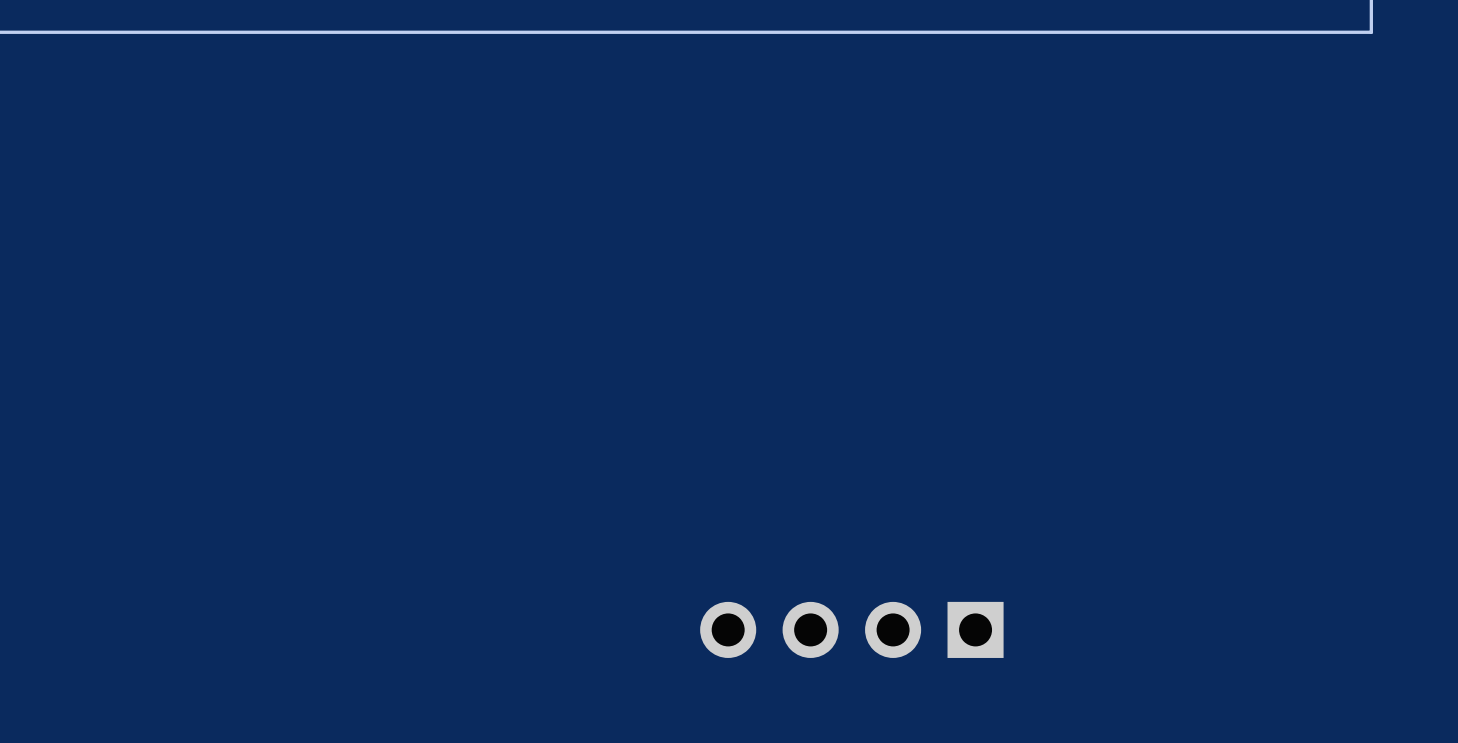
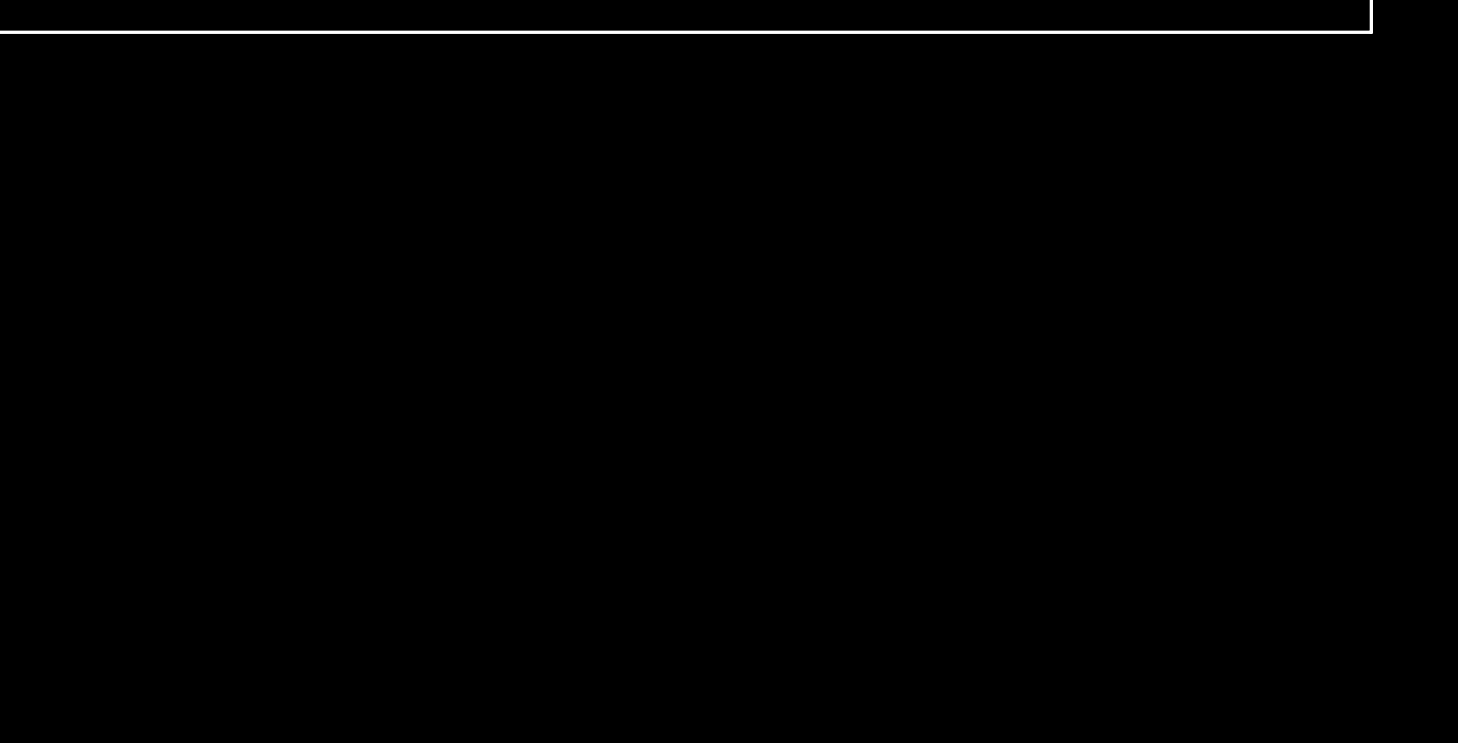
part: (851, 629) -> none

